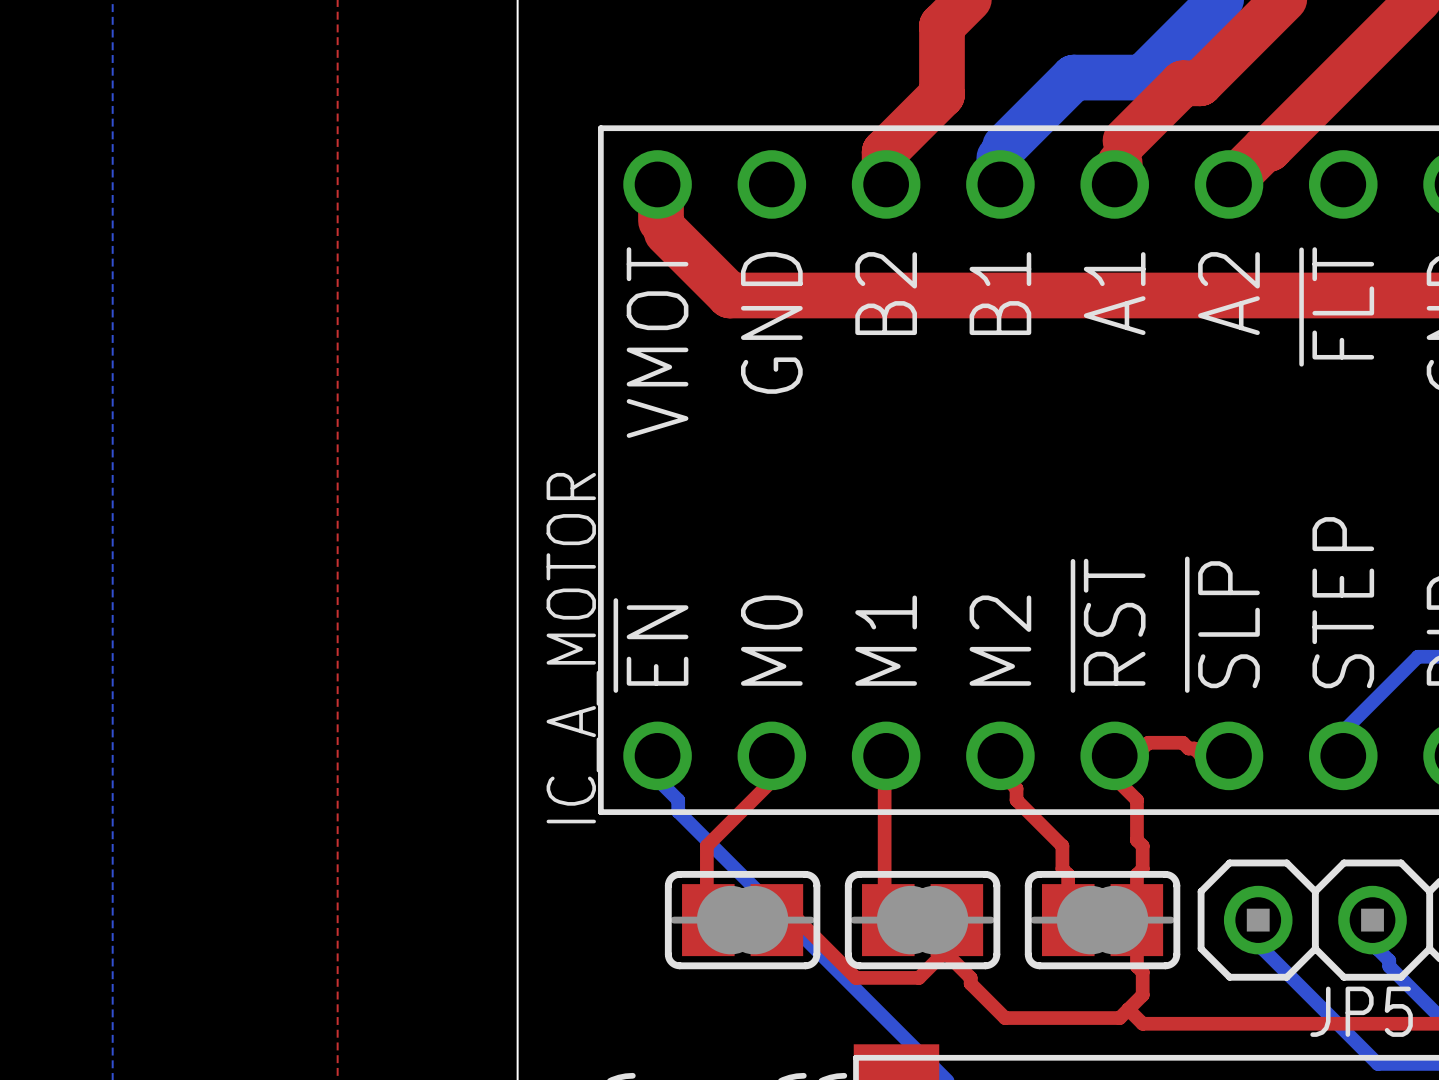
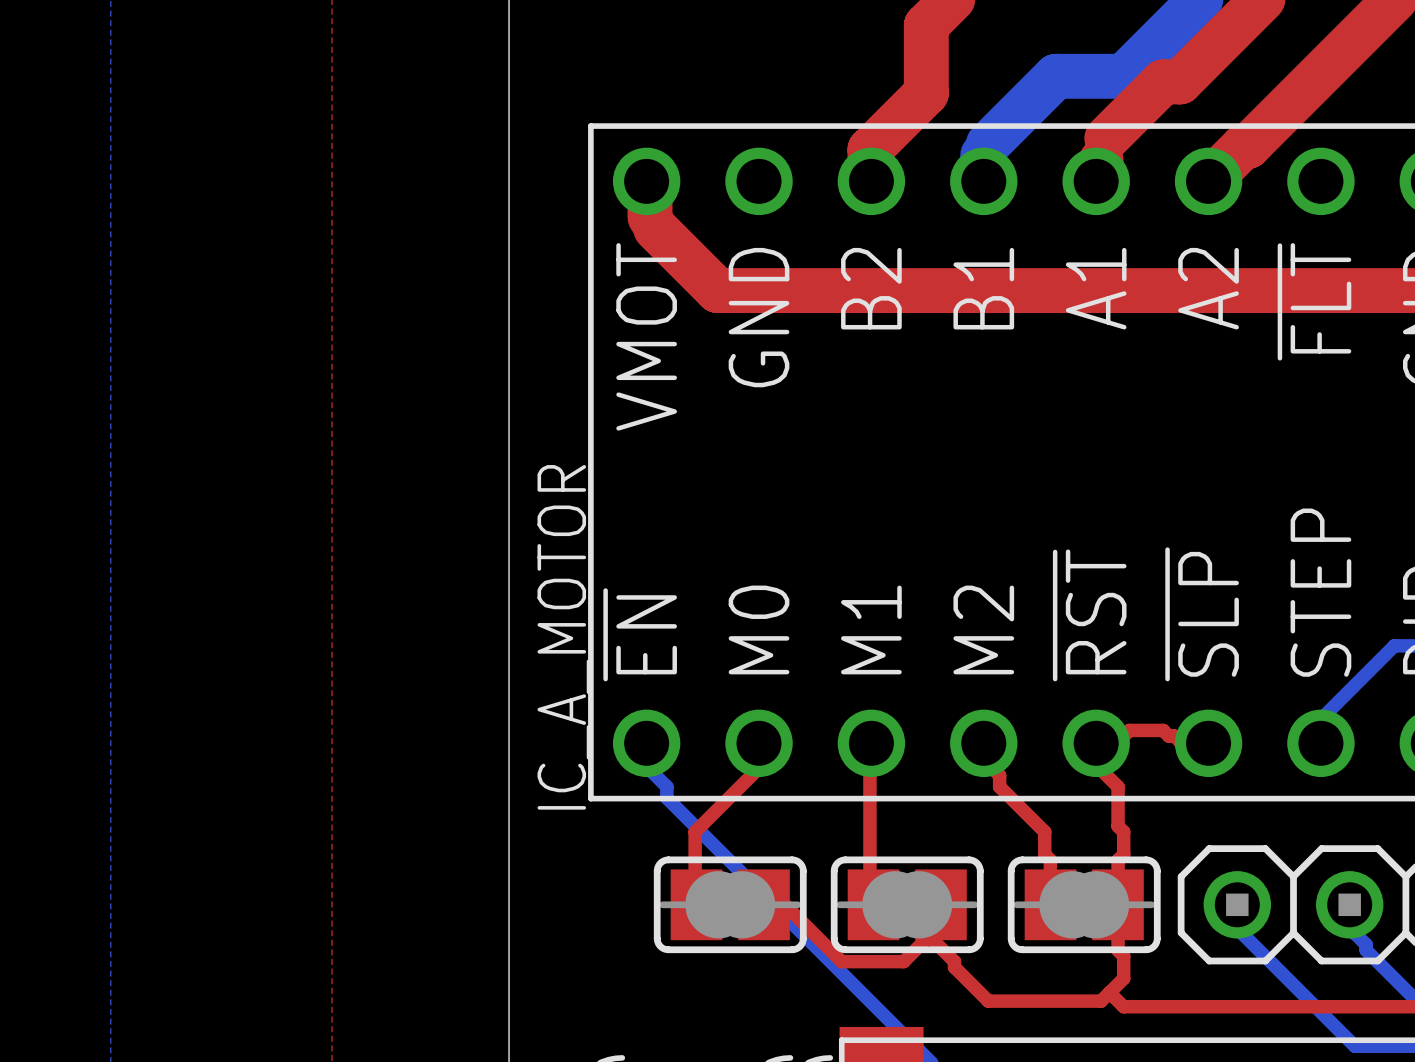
JP5 name: JP5 (1361, 1011) -> none

